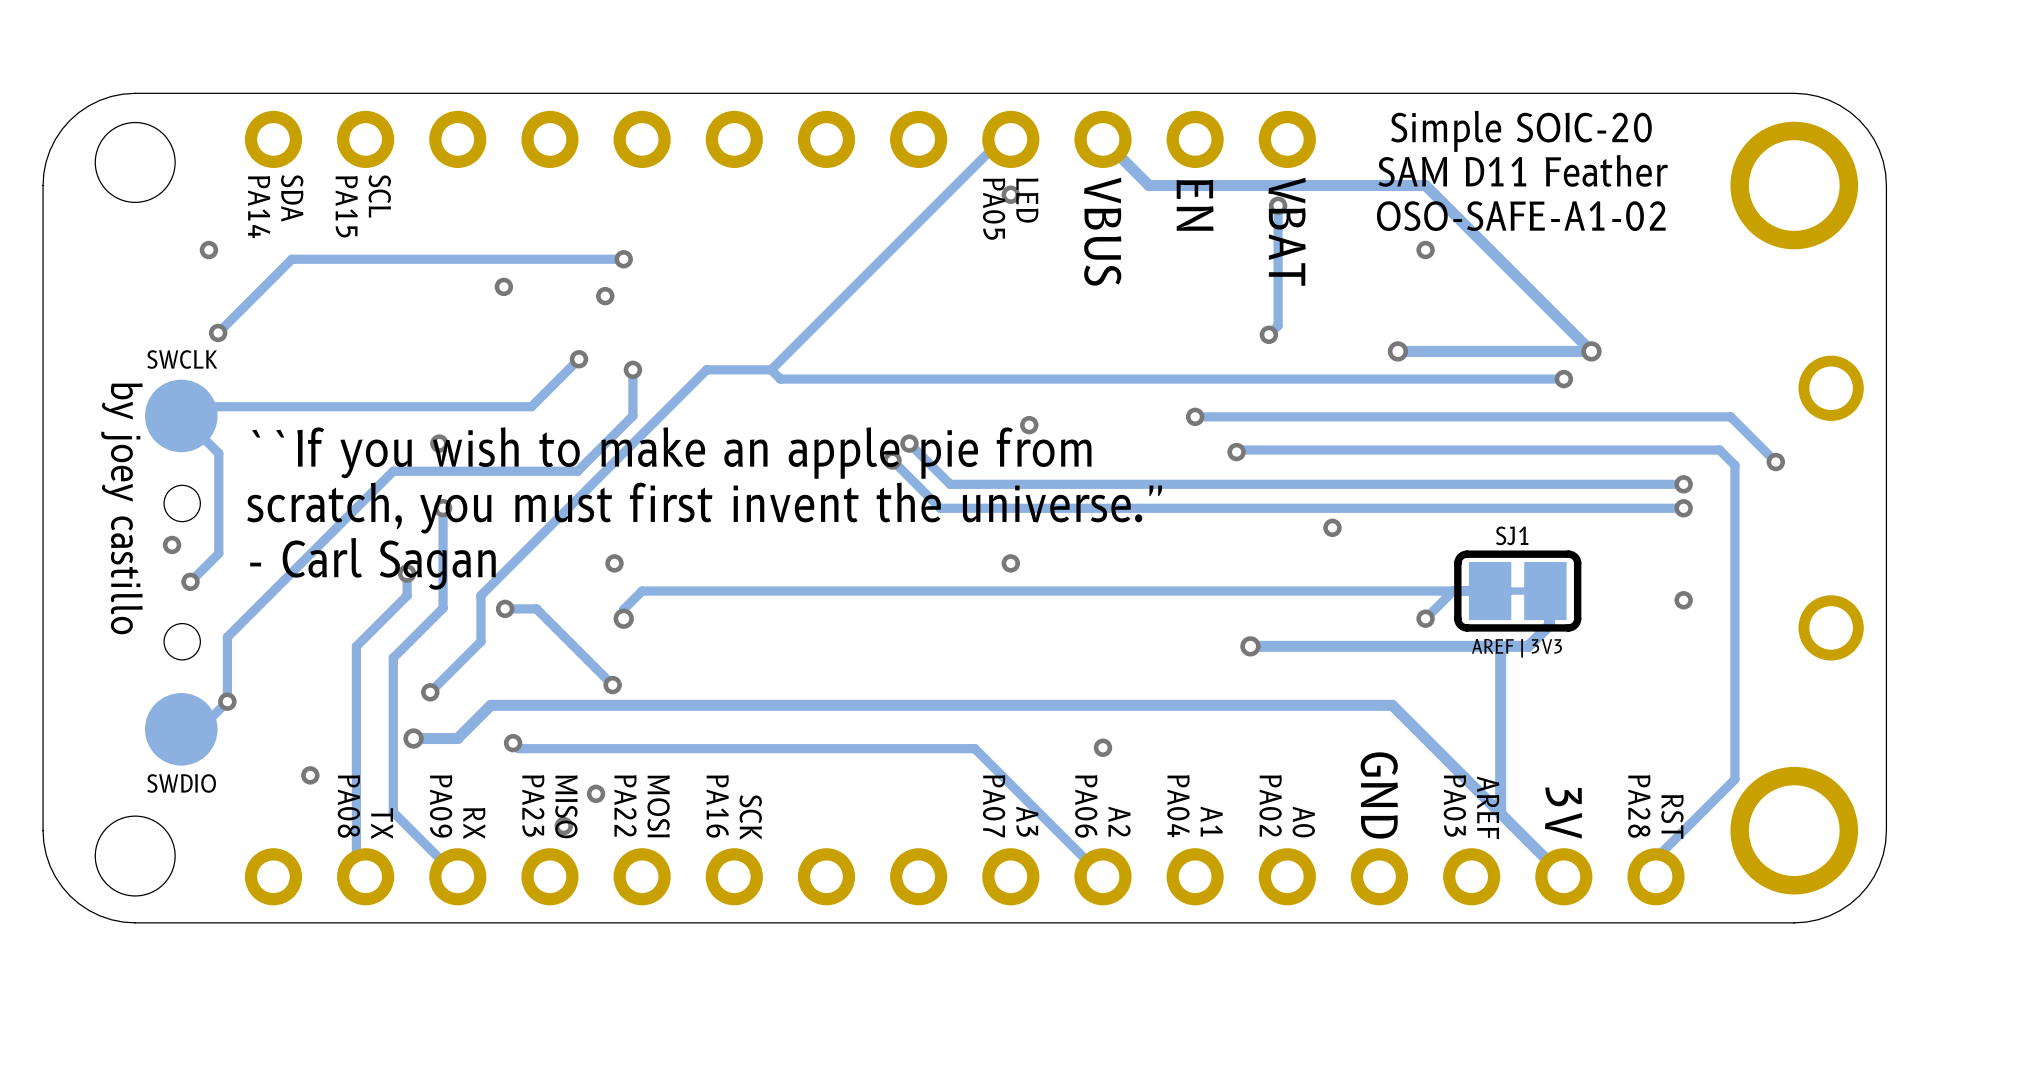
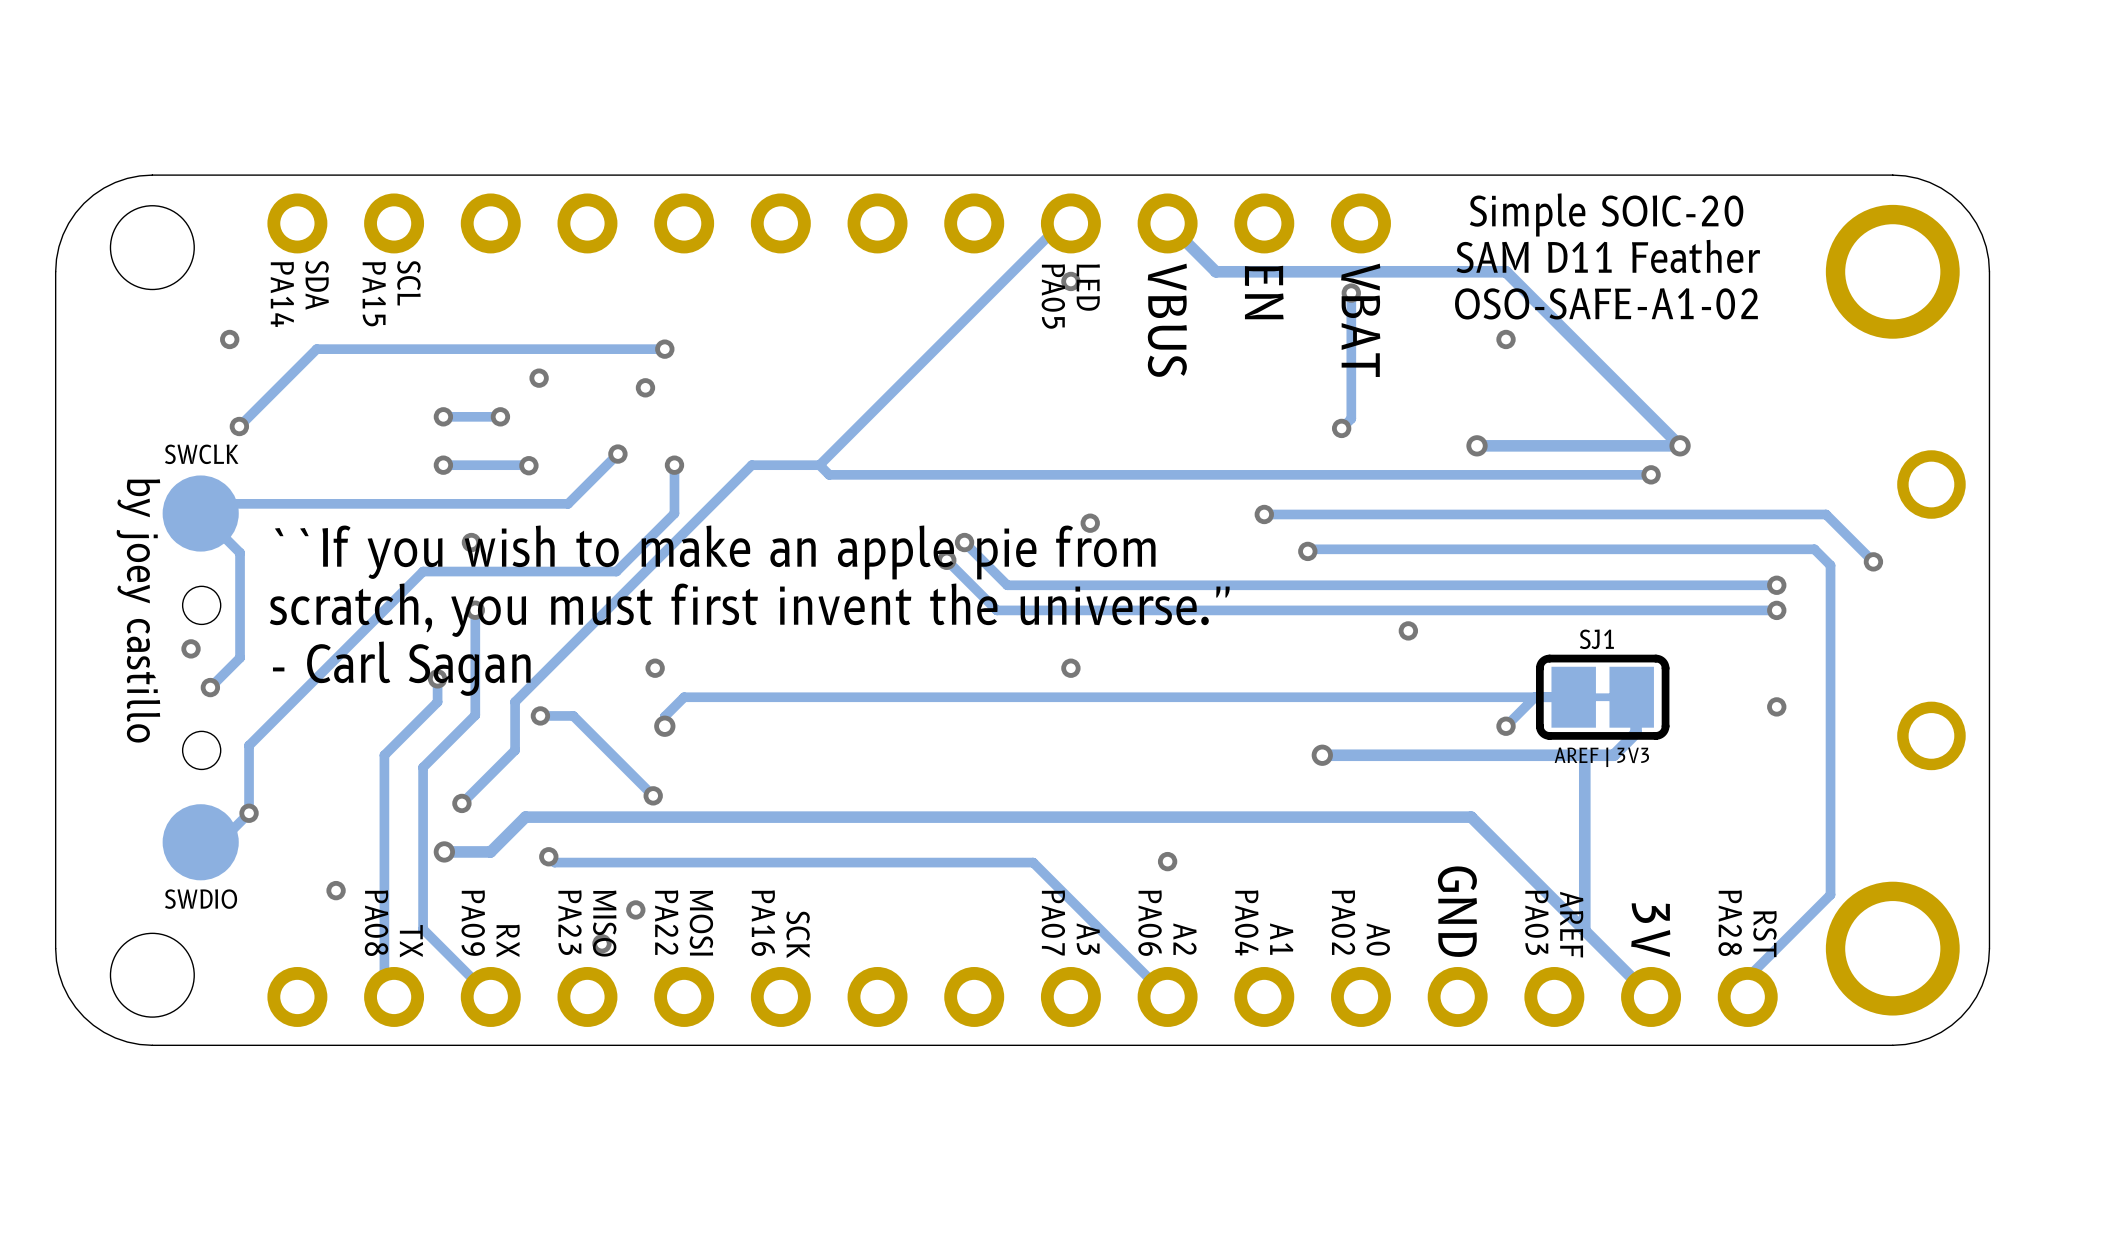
via: none -> (443, 416)
track: none -> (500, 416) (443, 416)
via: none -> (500, 416)
via: none -> (443, 465)
track: none -> (528, 465) (443, 465)
via: none -> (528, 465)

